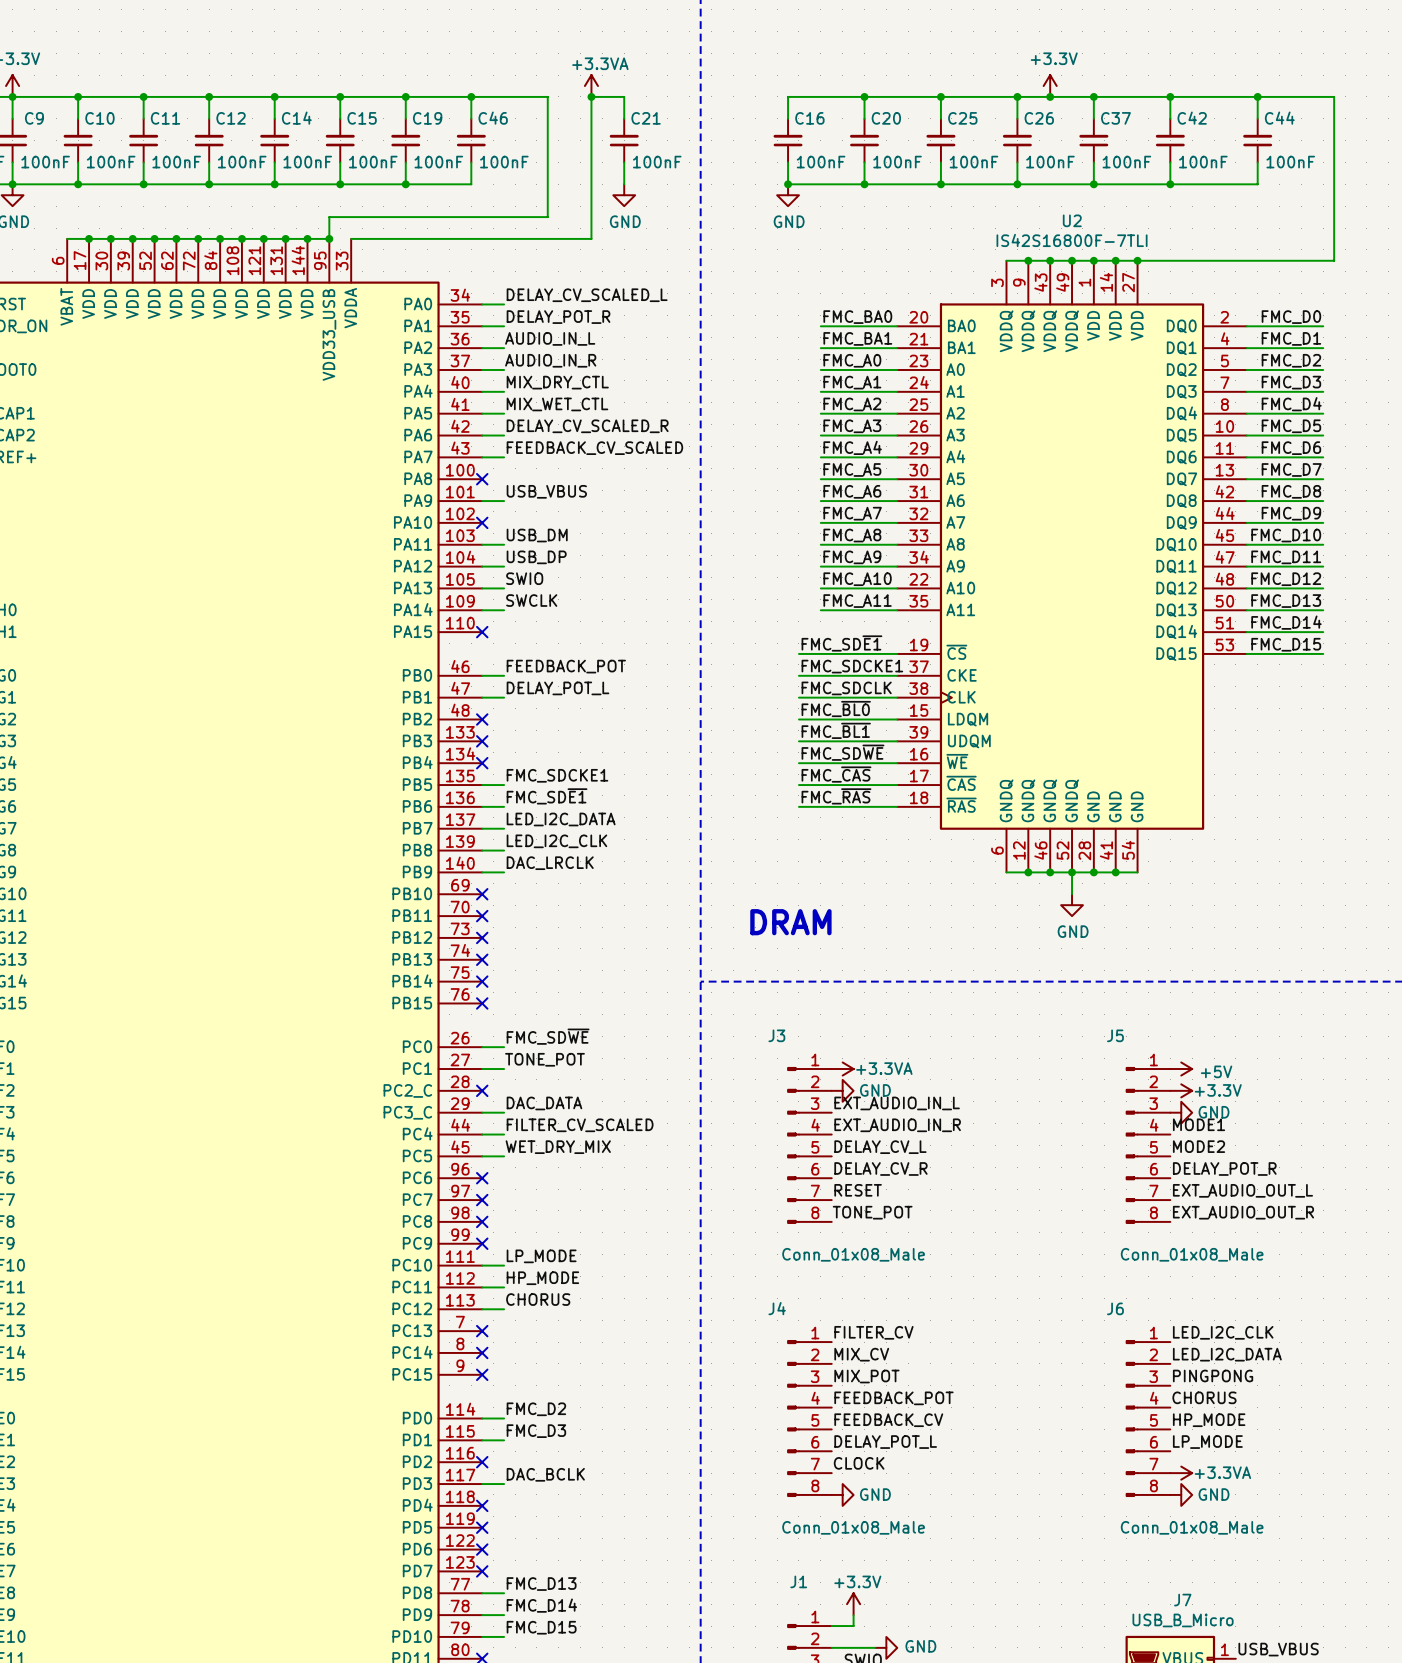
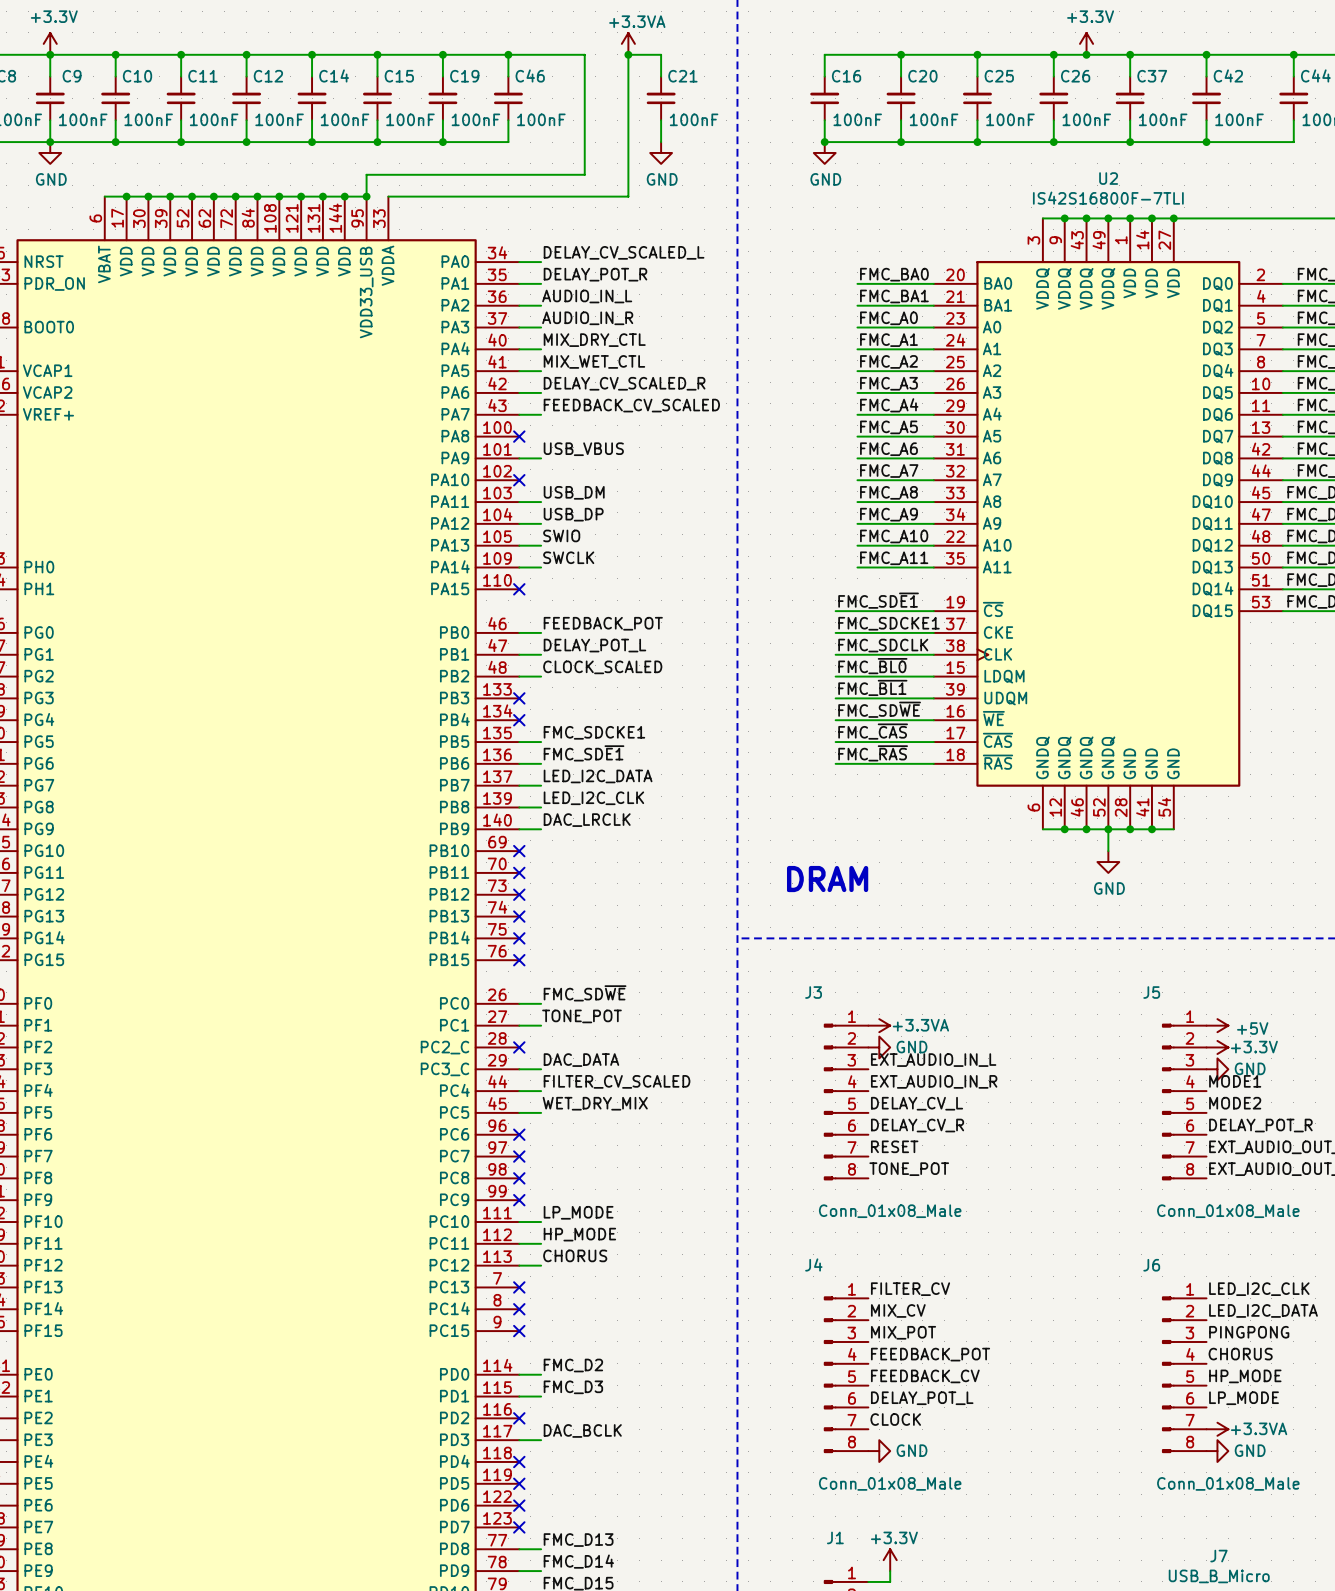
label: none -> CLOCK_SCALED (602, 667)
wire: none -> (519, 676) (541, 676)
no-connect mark: (482, 719) -> none

